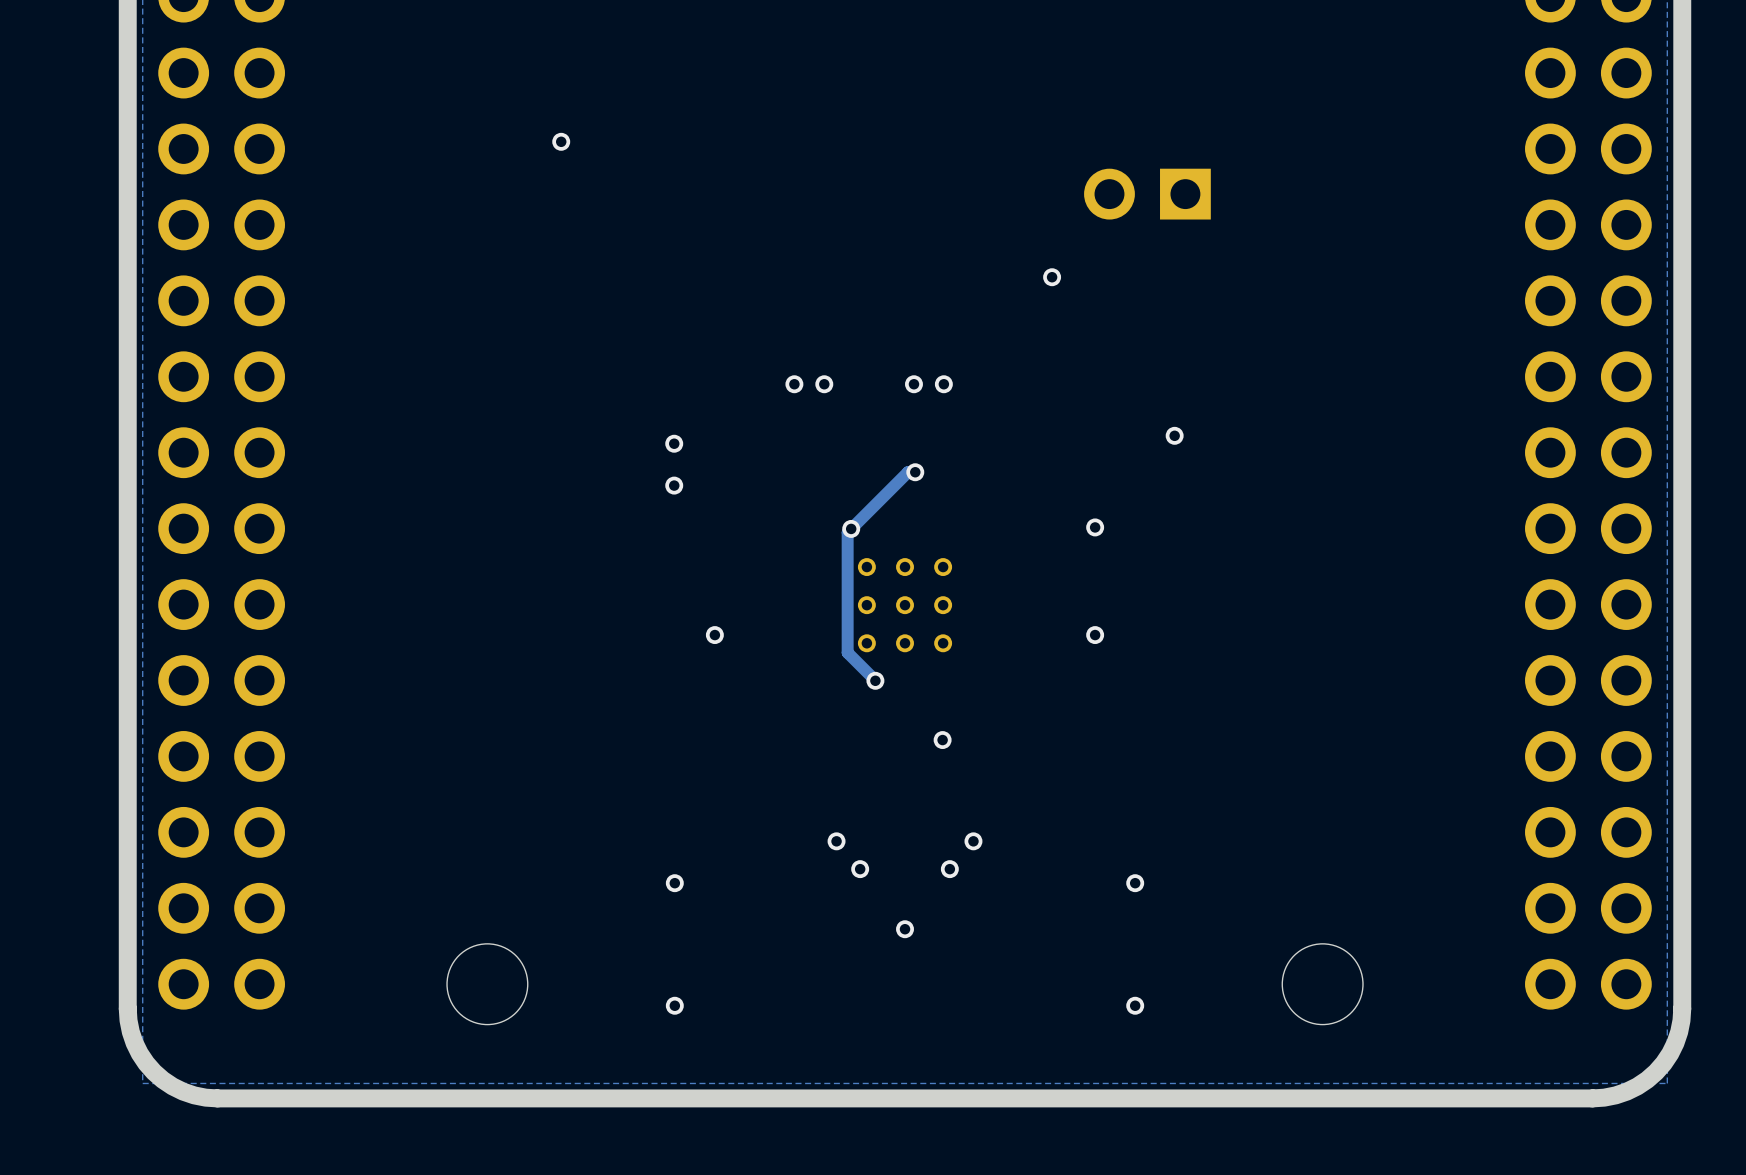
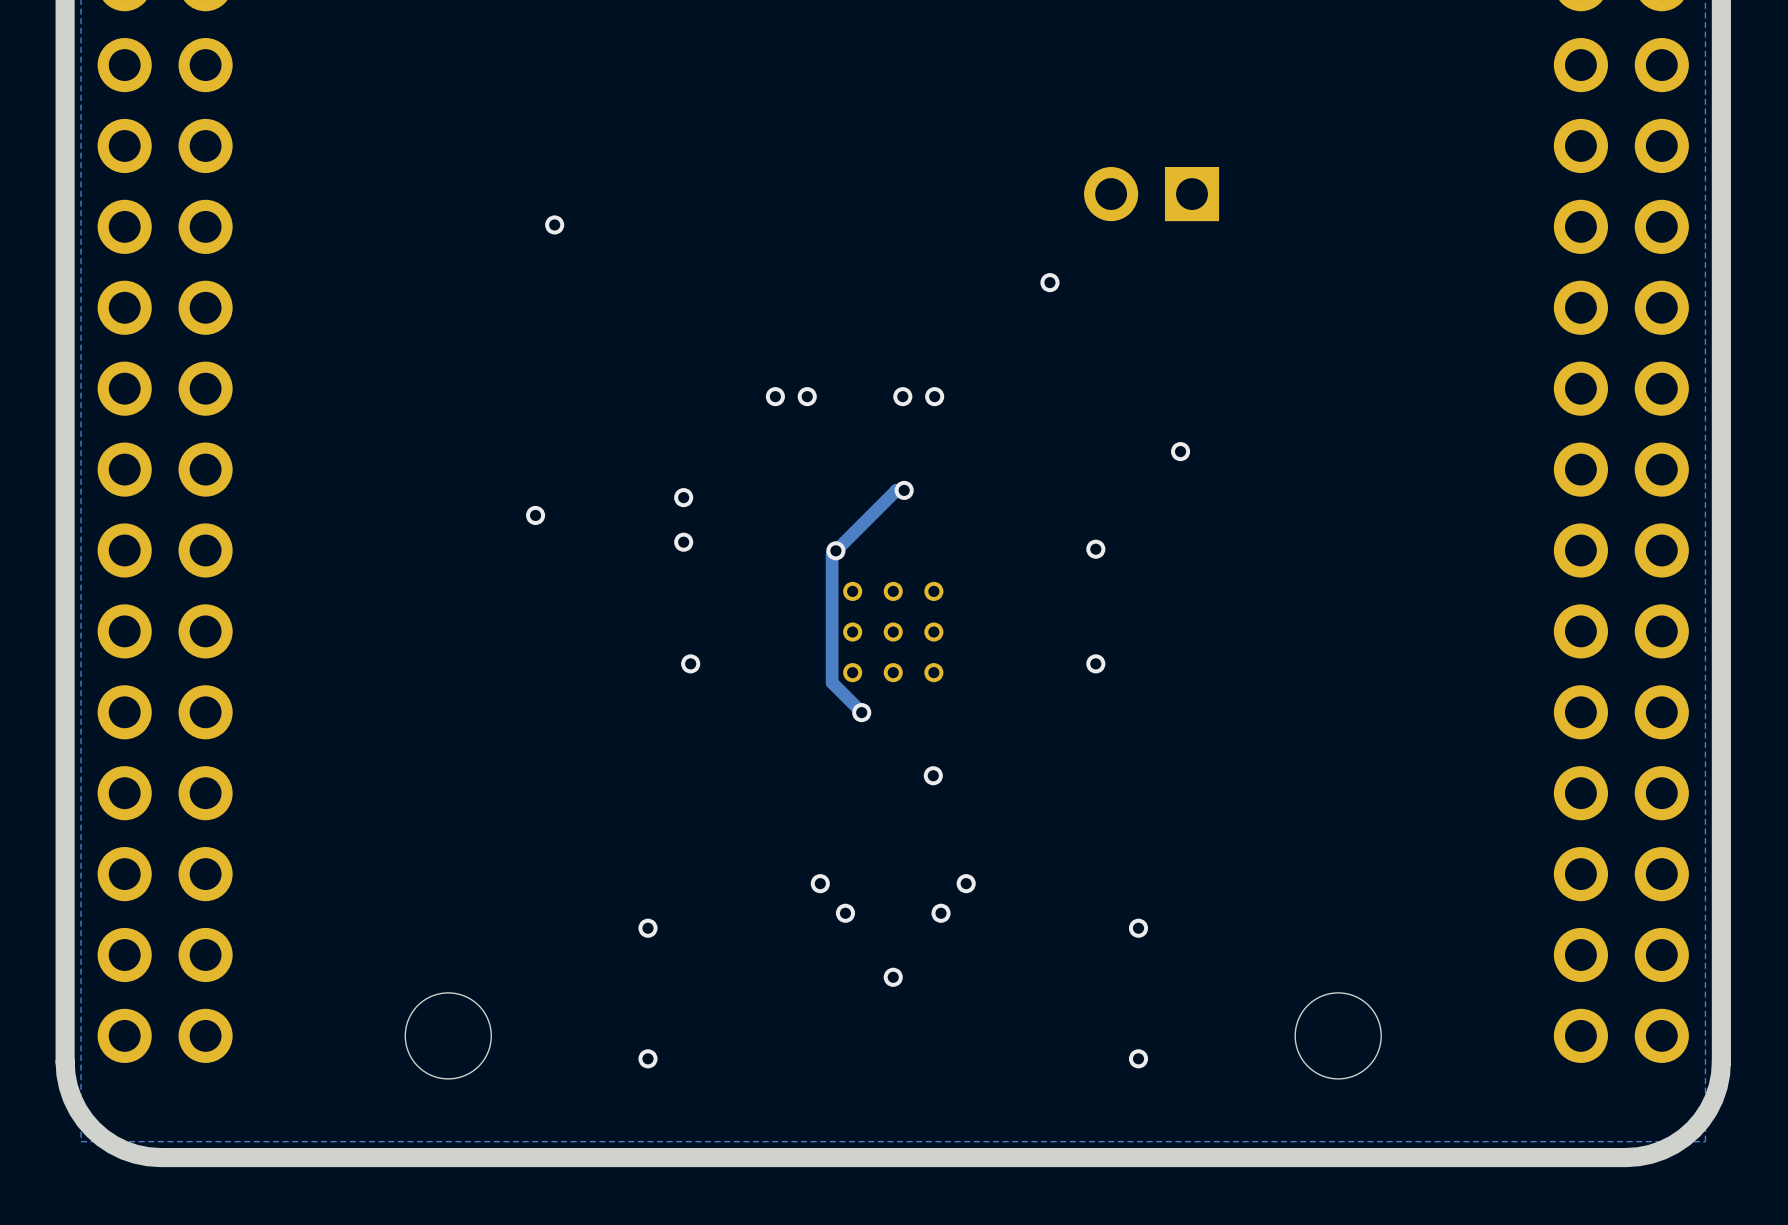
via position: (561, 141) -> (554, 224)
via: (674, 443) -> none
via: none -> (683, 497)
via: (674, 485) -> none
via: none -> (535, 515)
via: none -> (683, 542)

